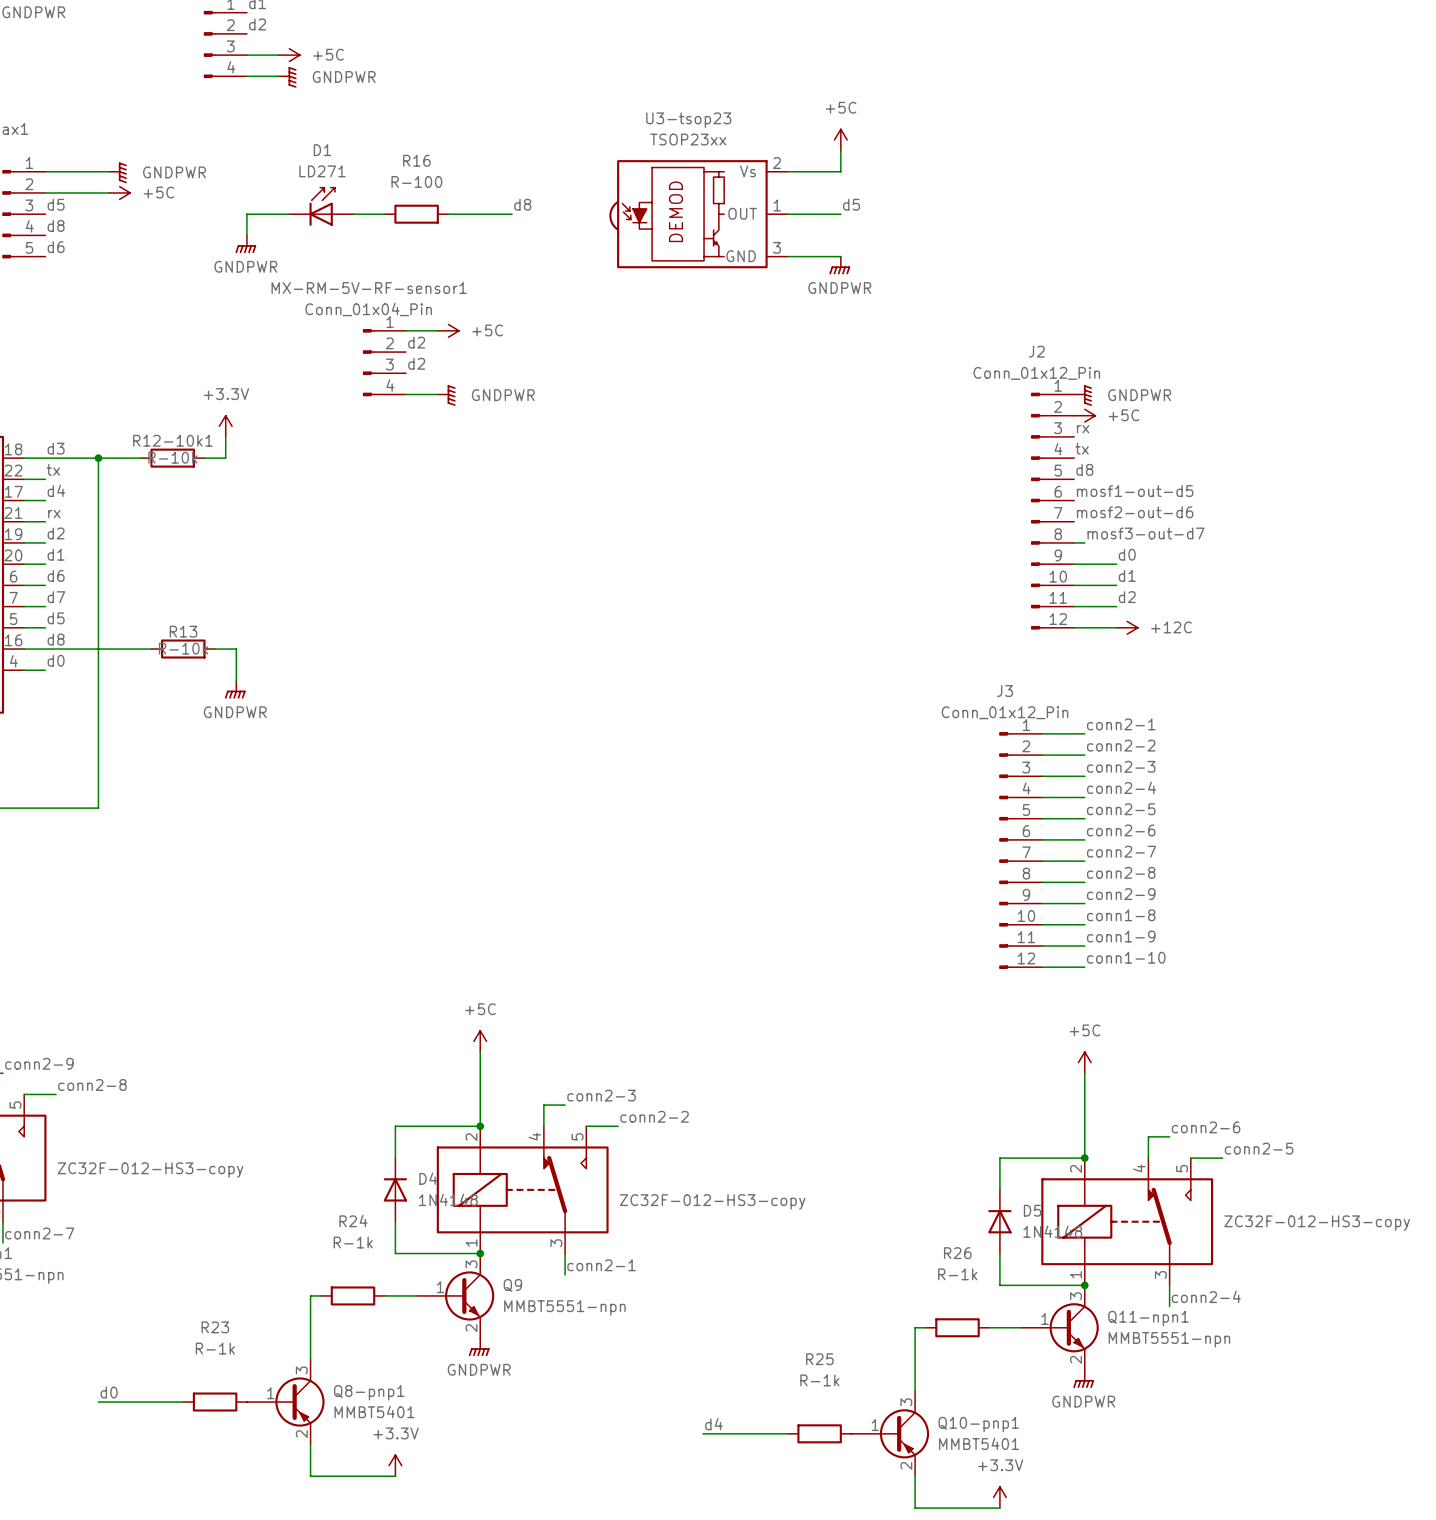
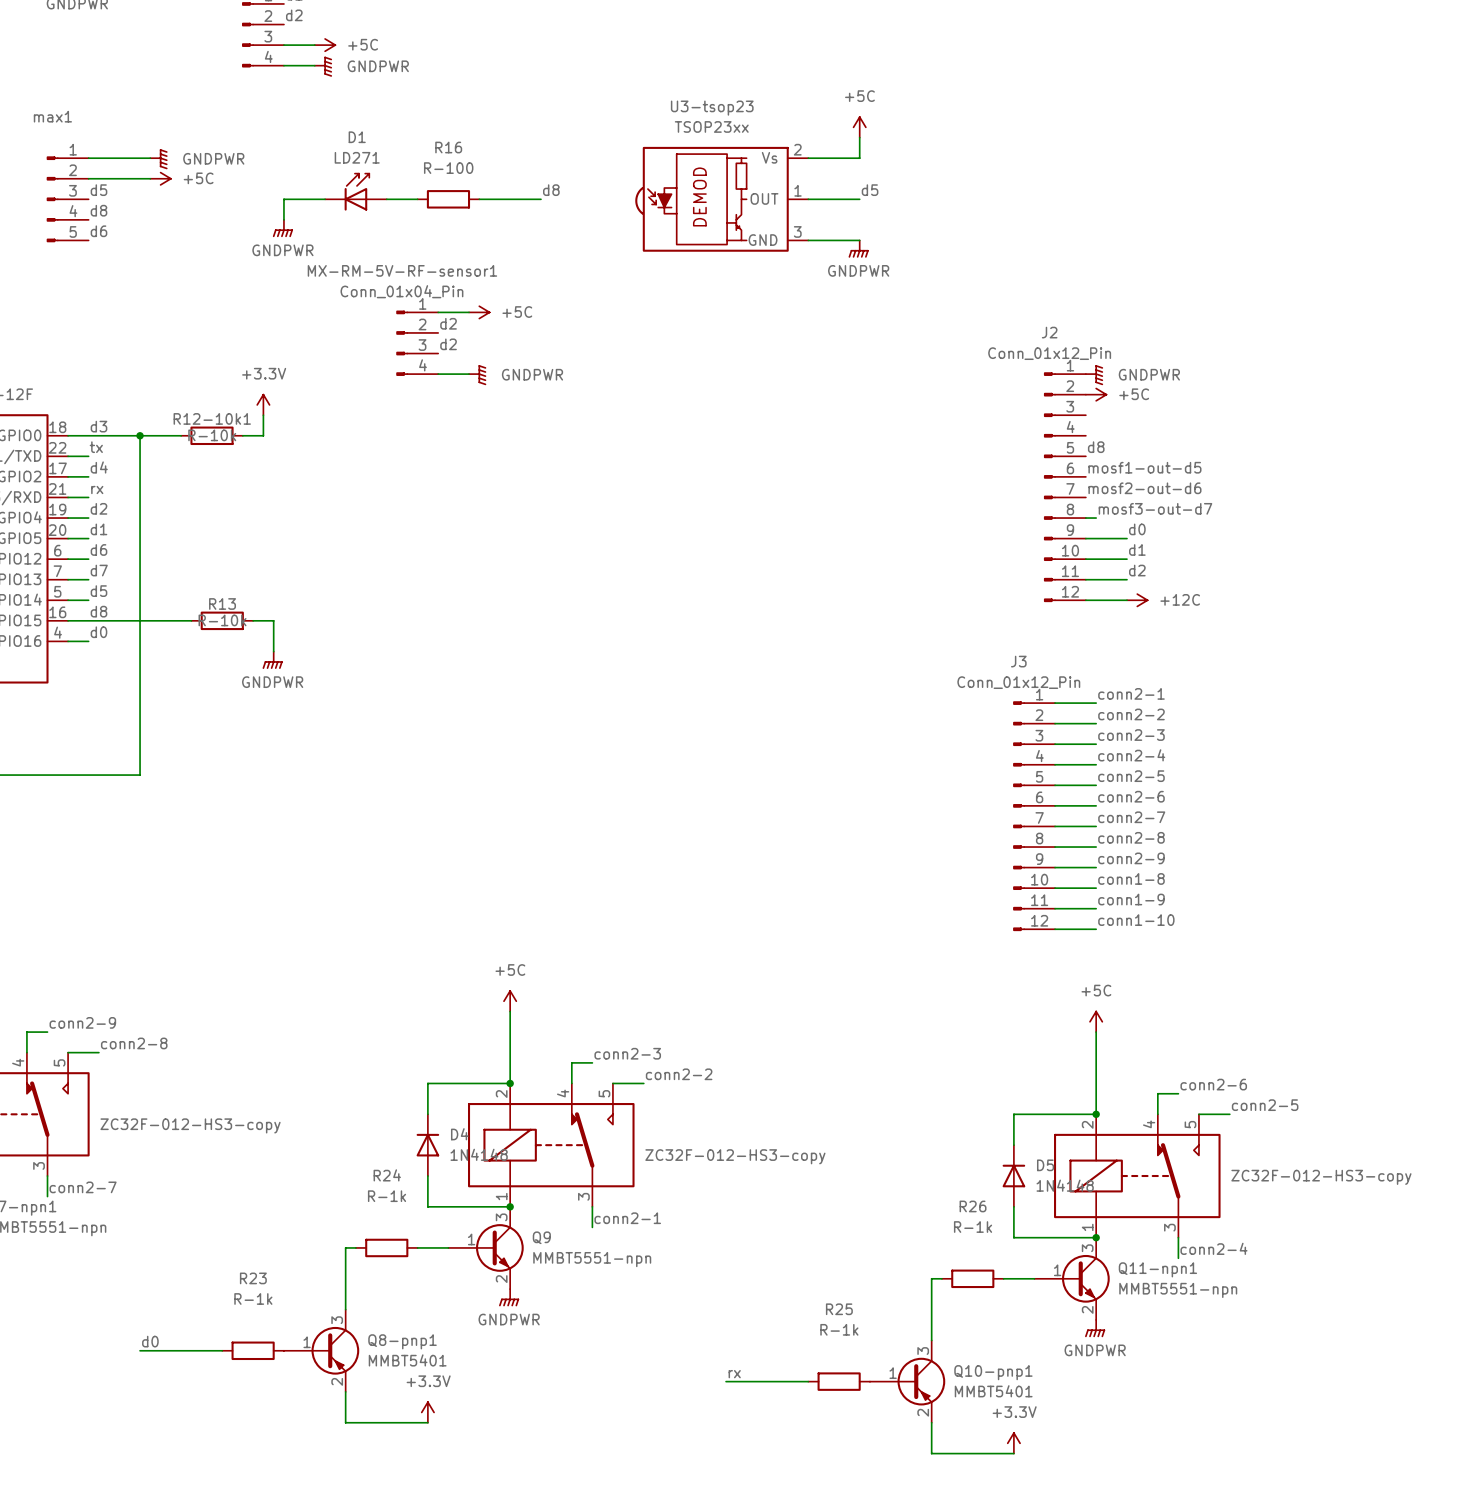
label: rx (1083, 429) -> none
label: tx (1082, 448) -> none
label: d4 (713, 1424) -> rx (734, 1374)

